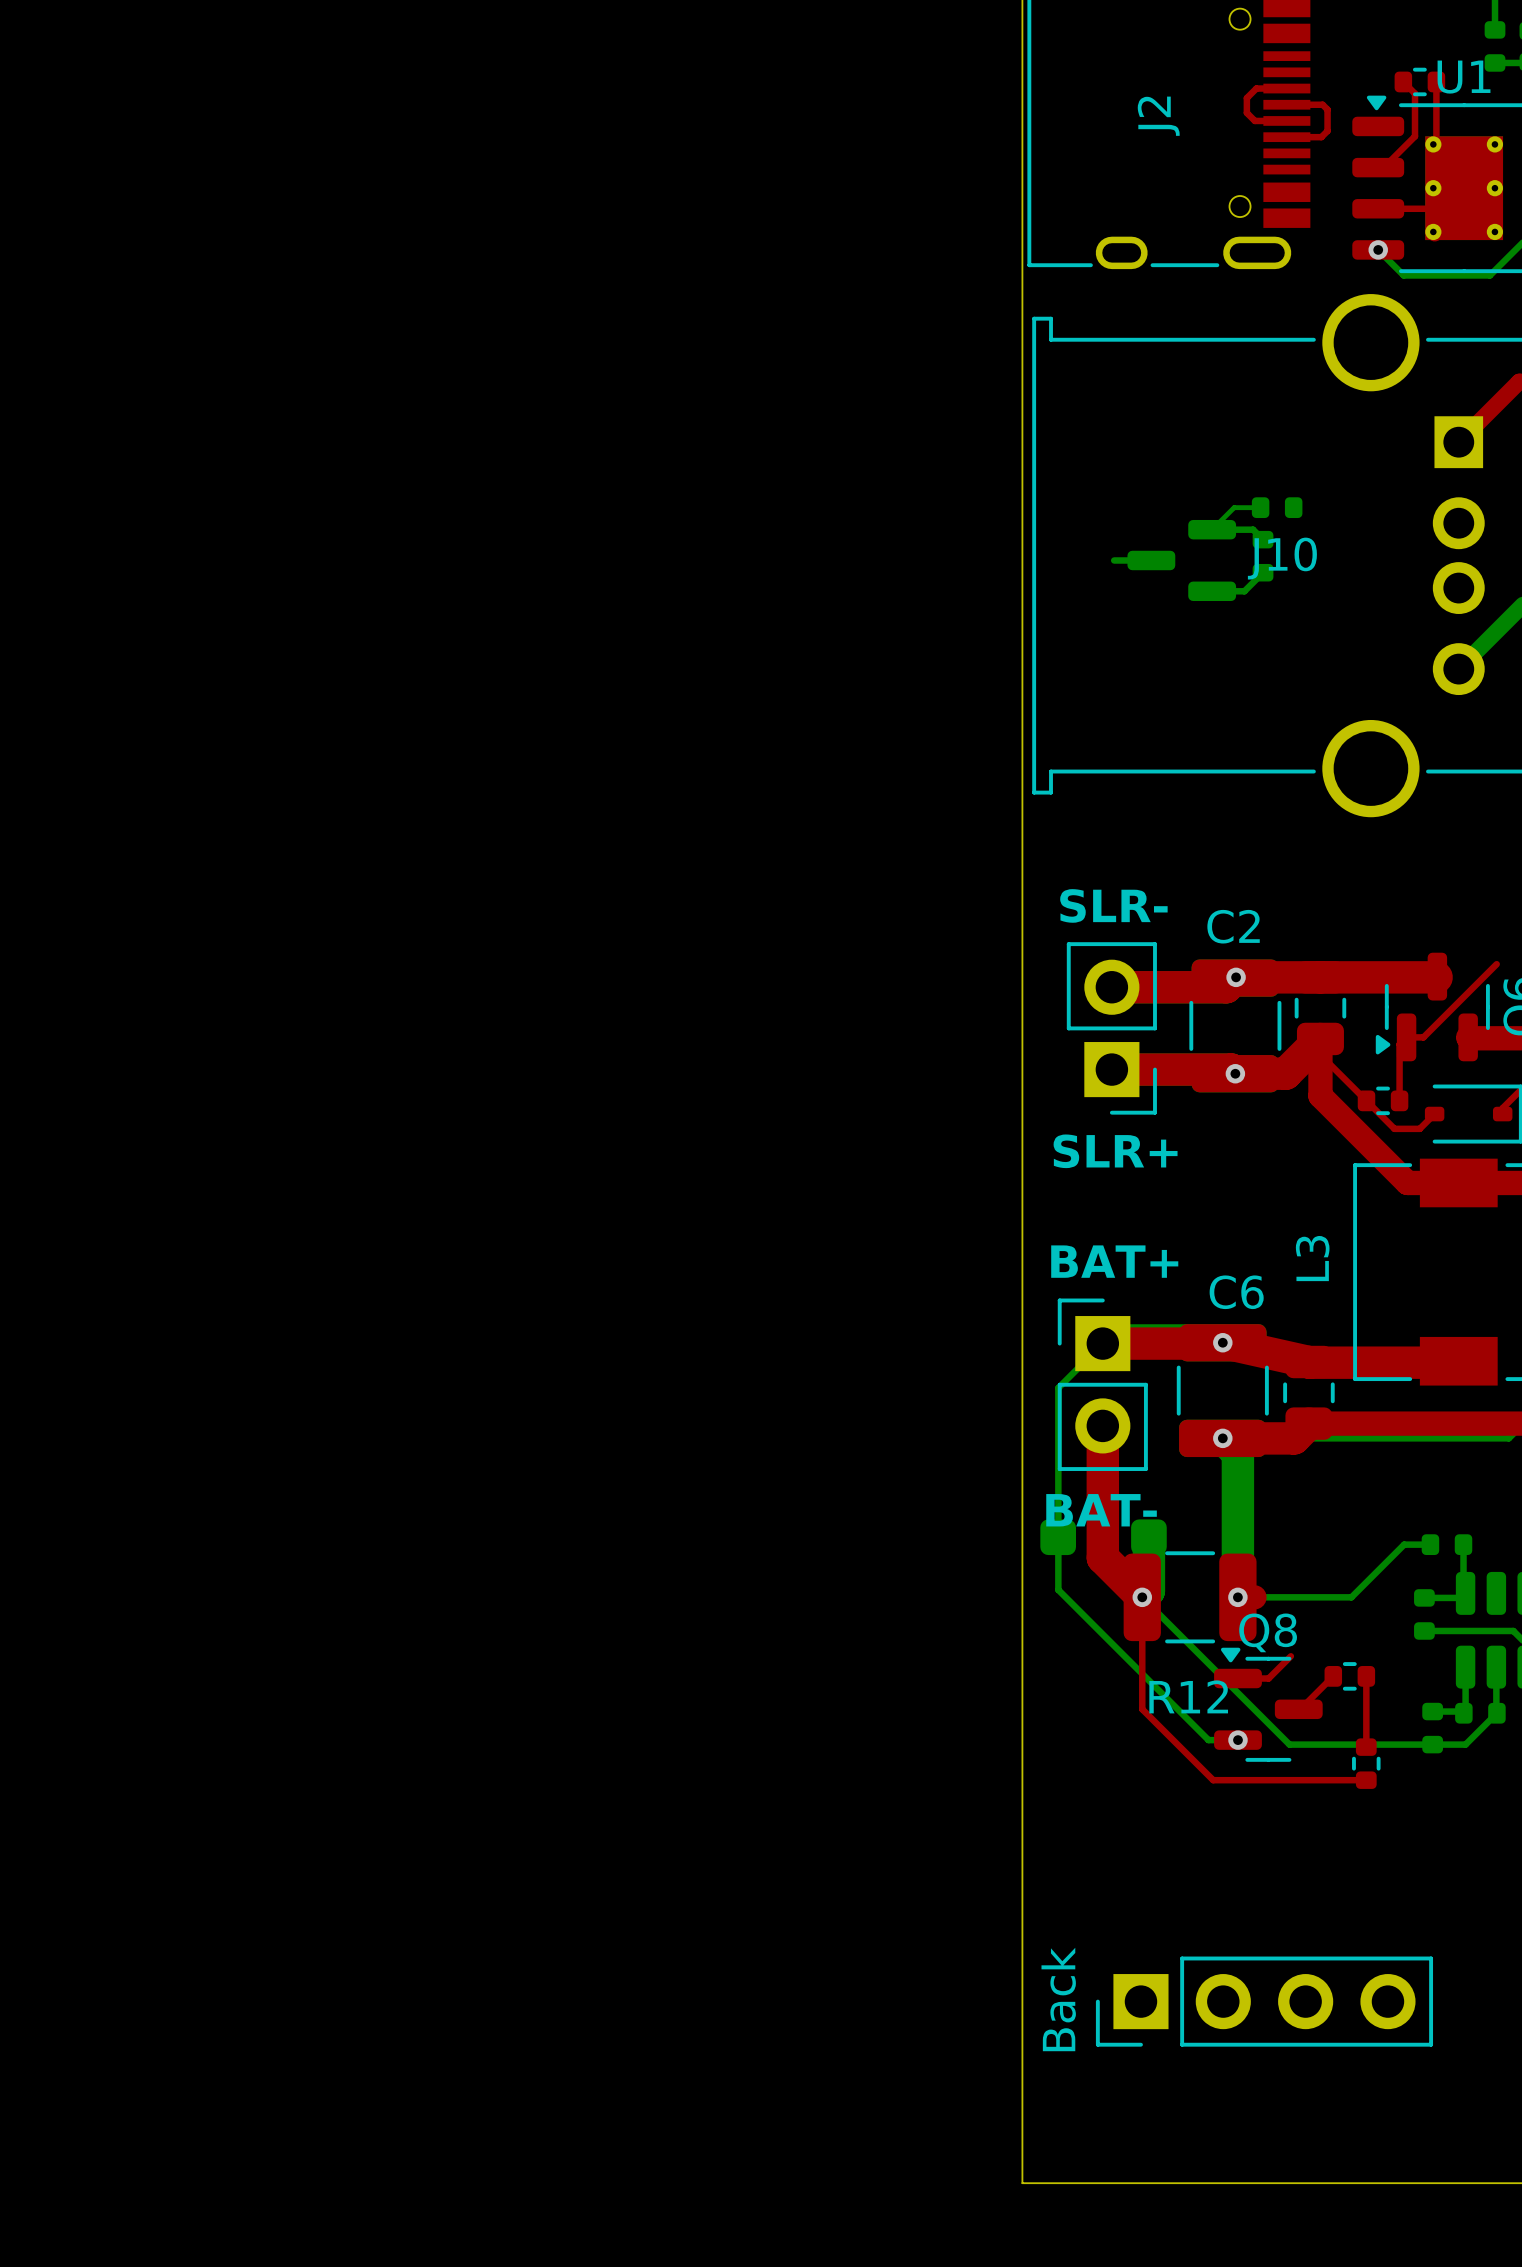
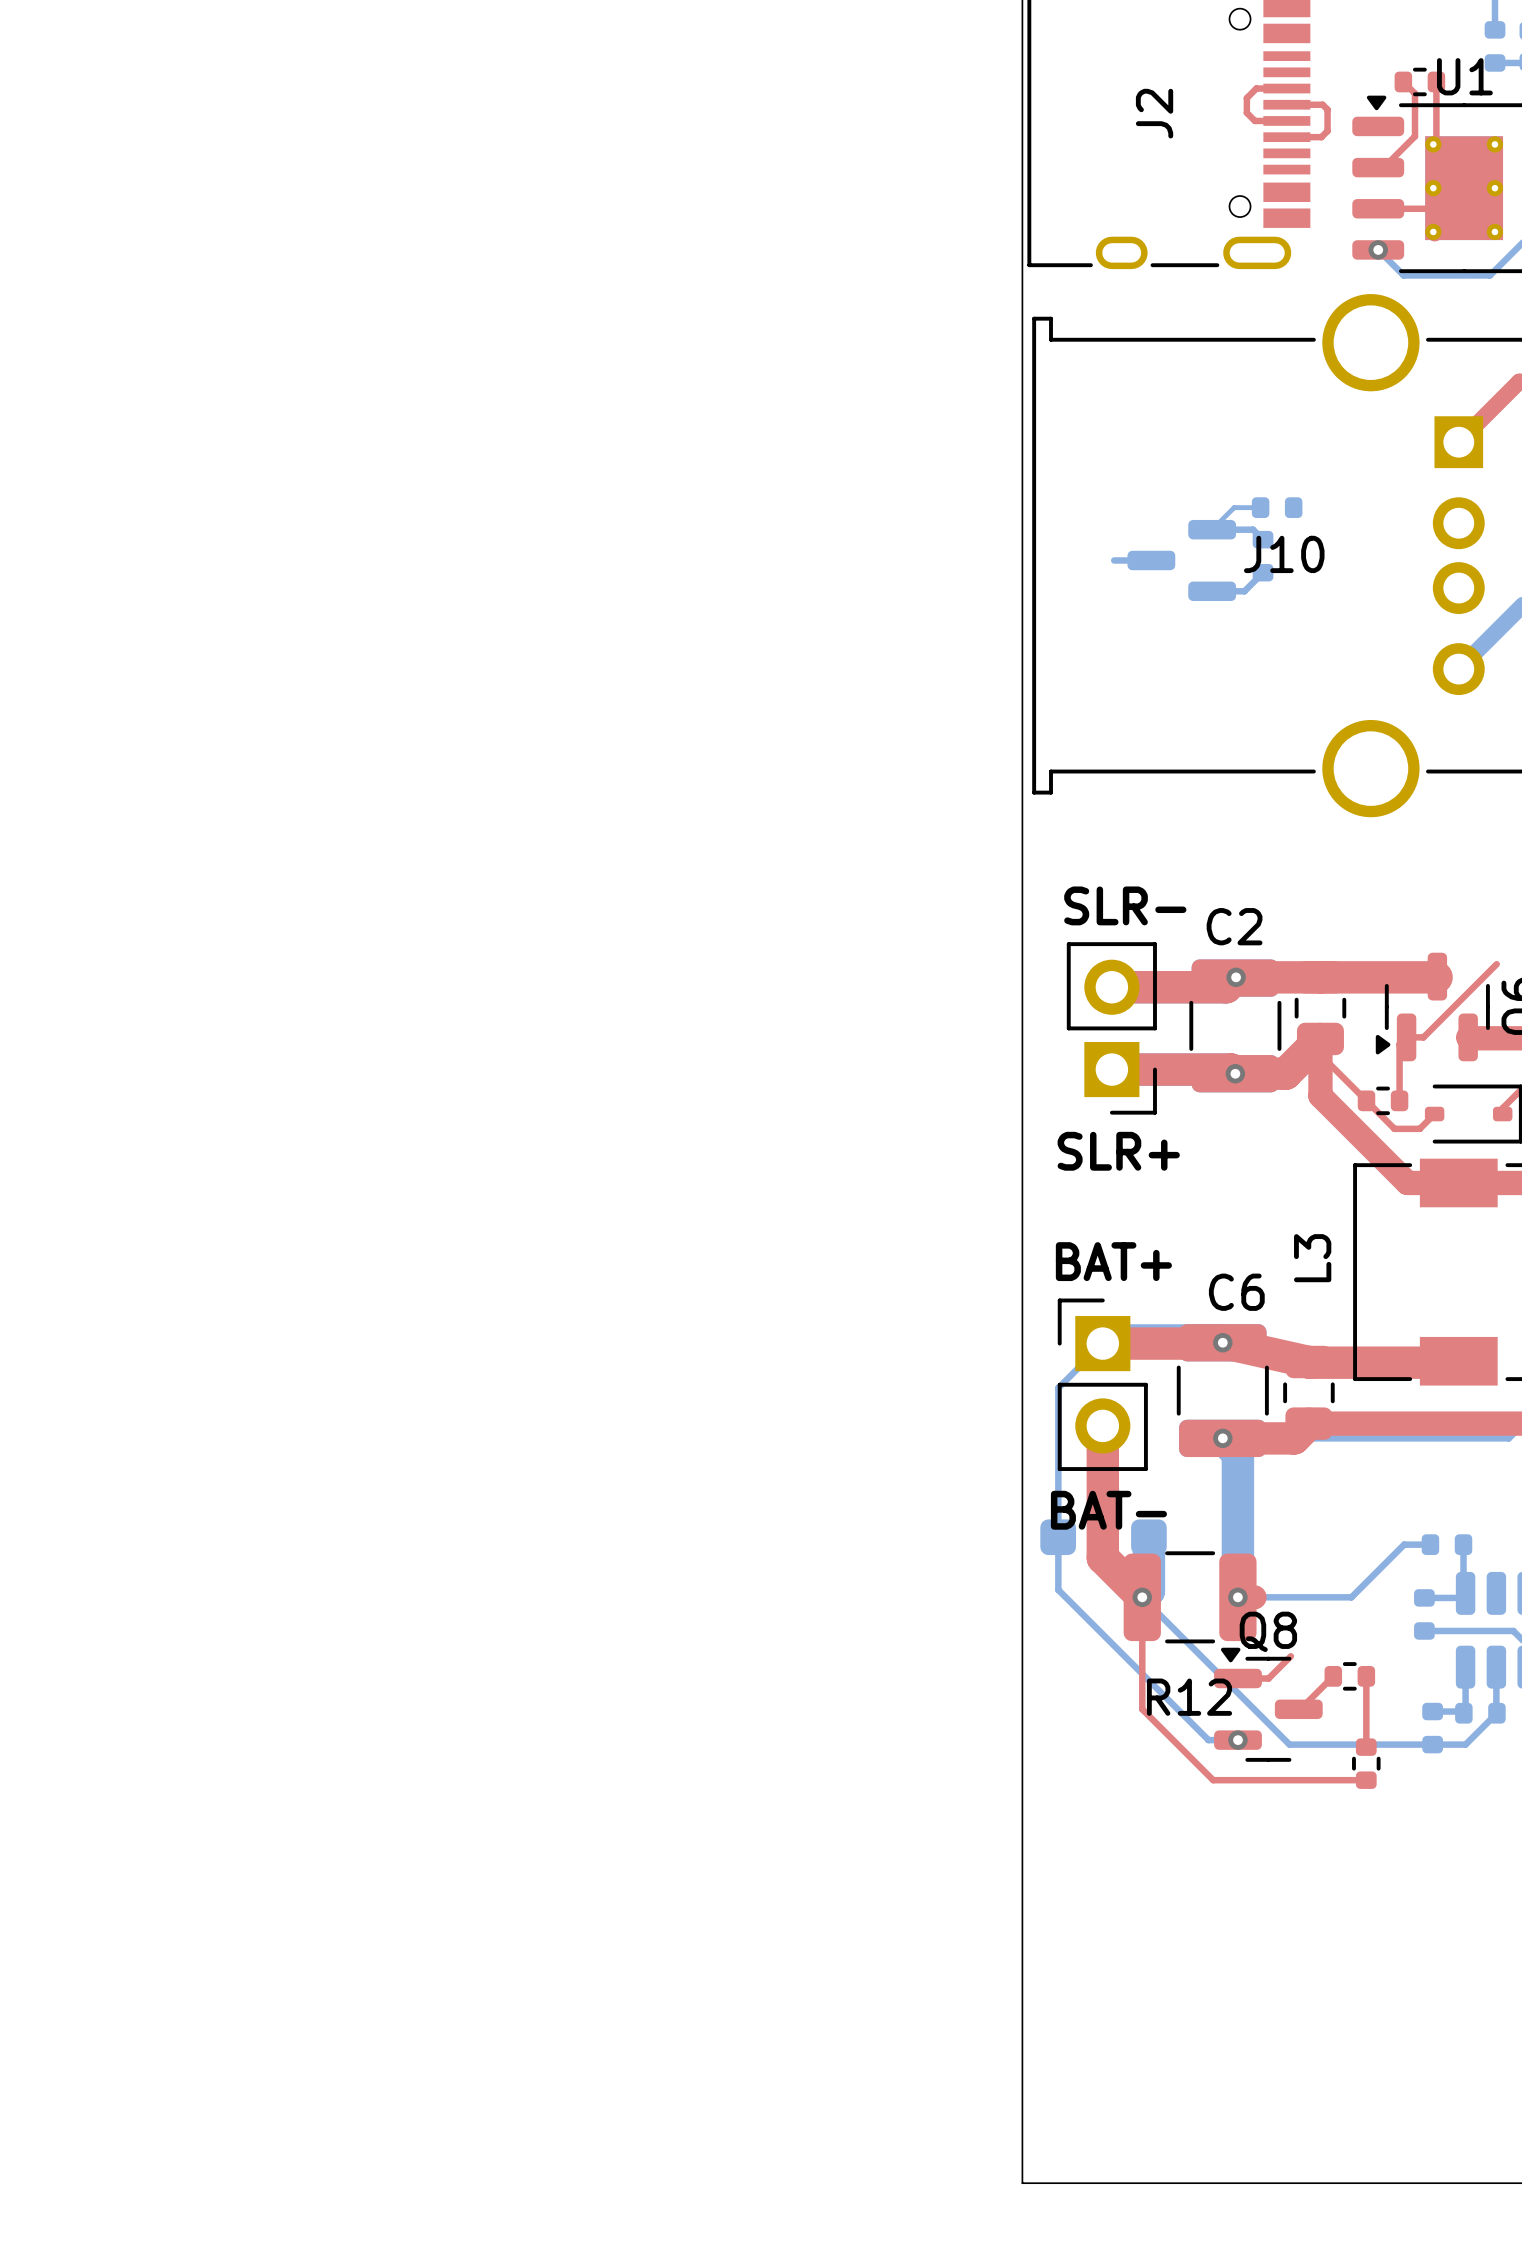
part: (1264, 2001) -> none

